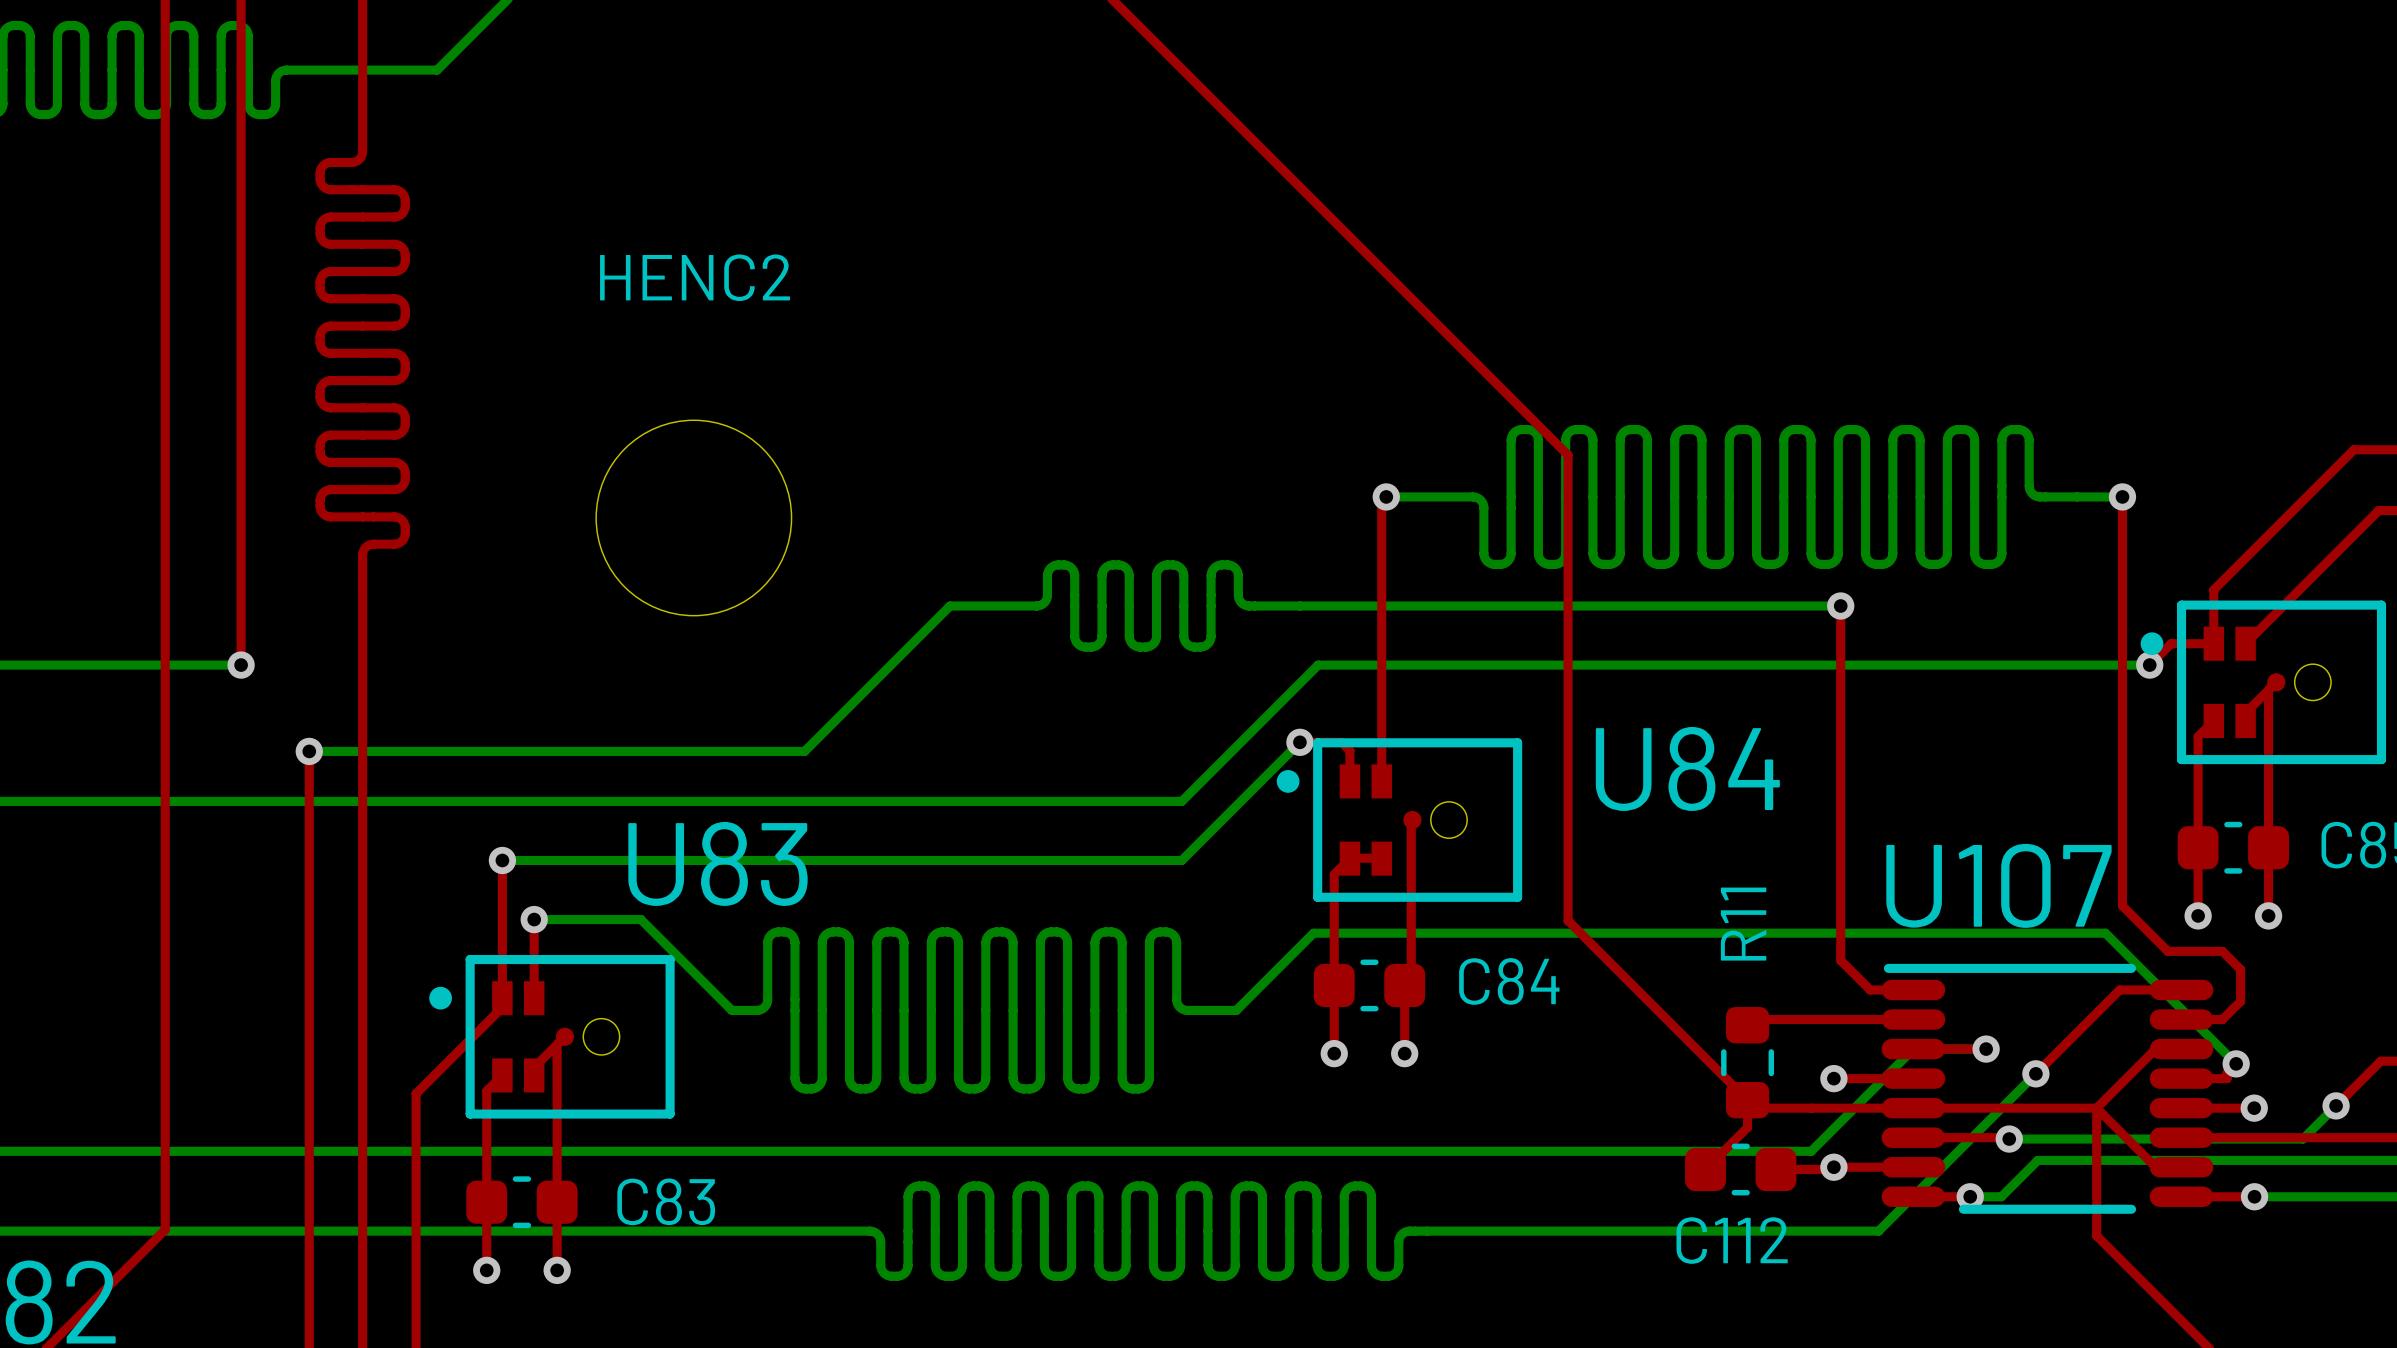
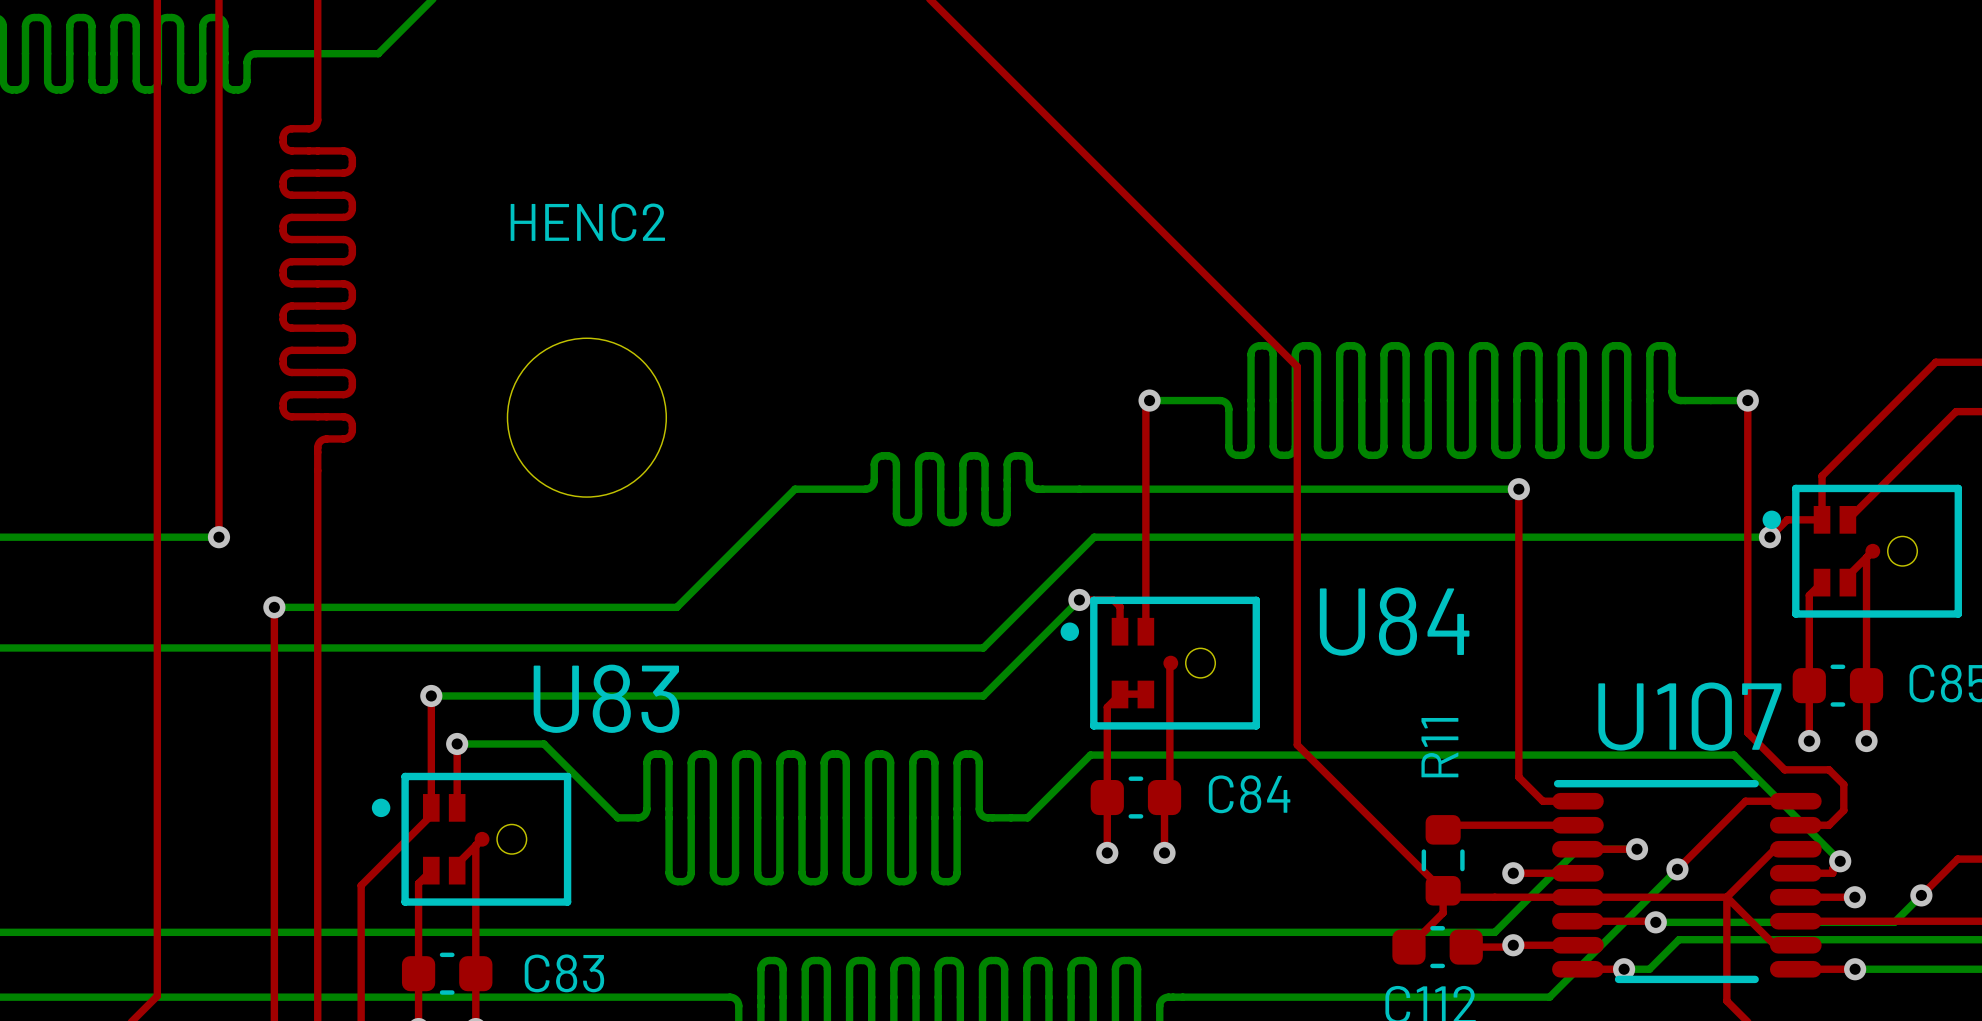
U107 name position: U107 (1998, 885) -> U107 (1689, 716)

